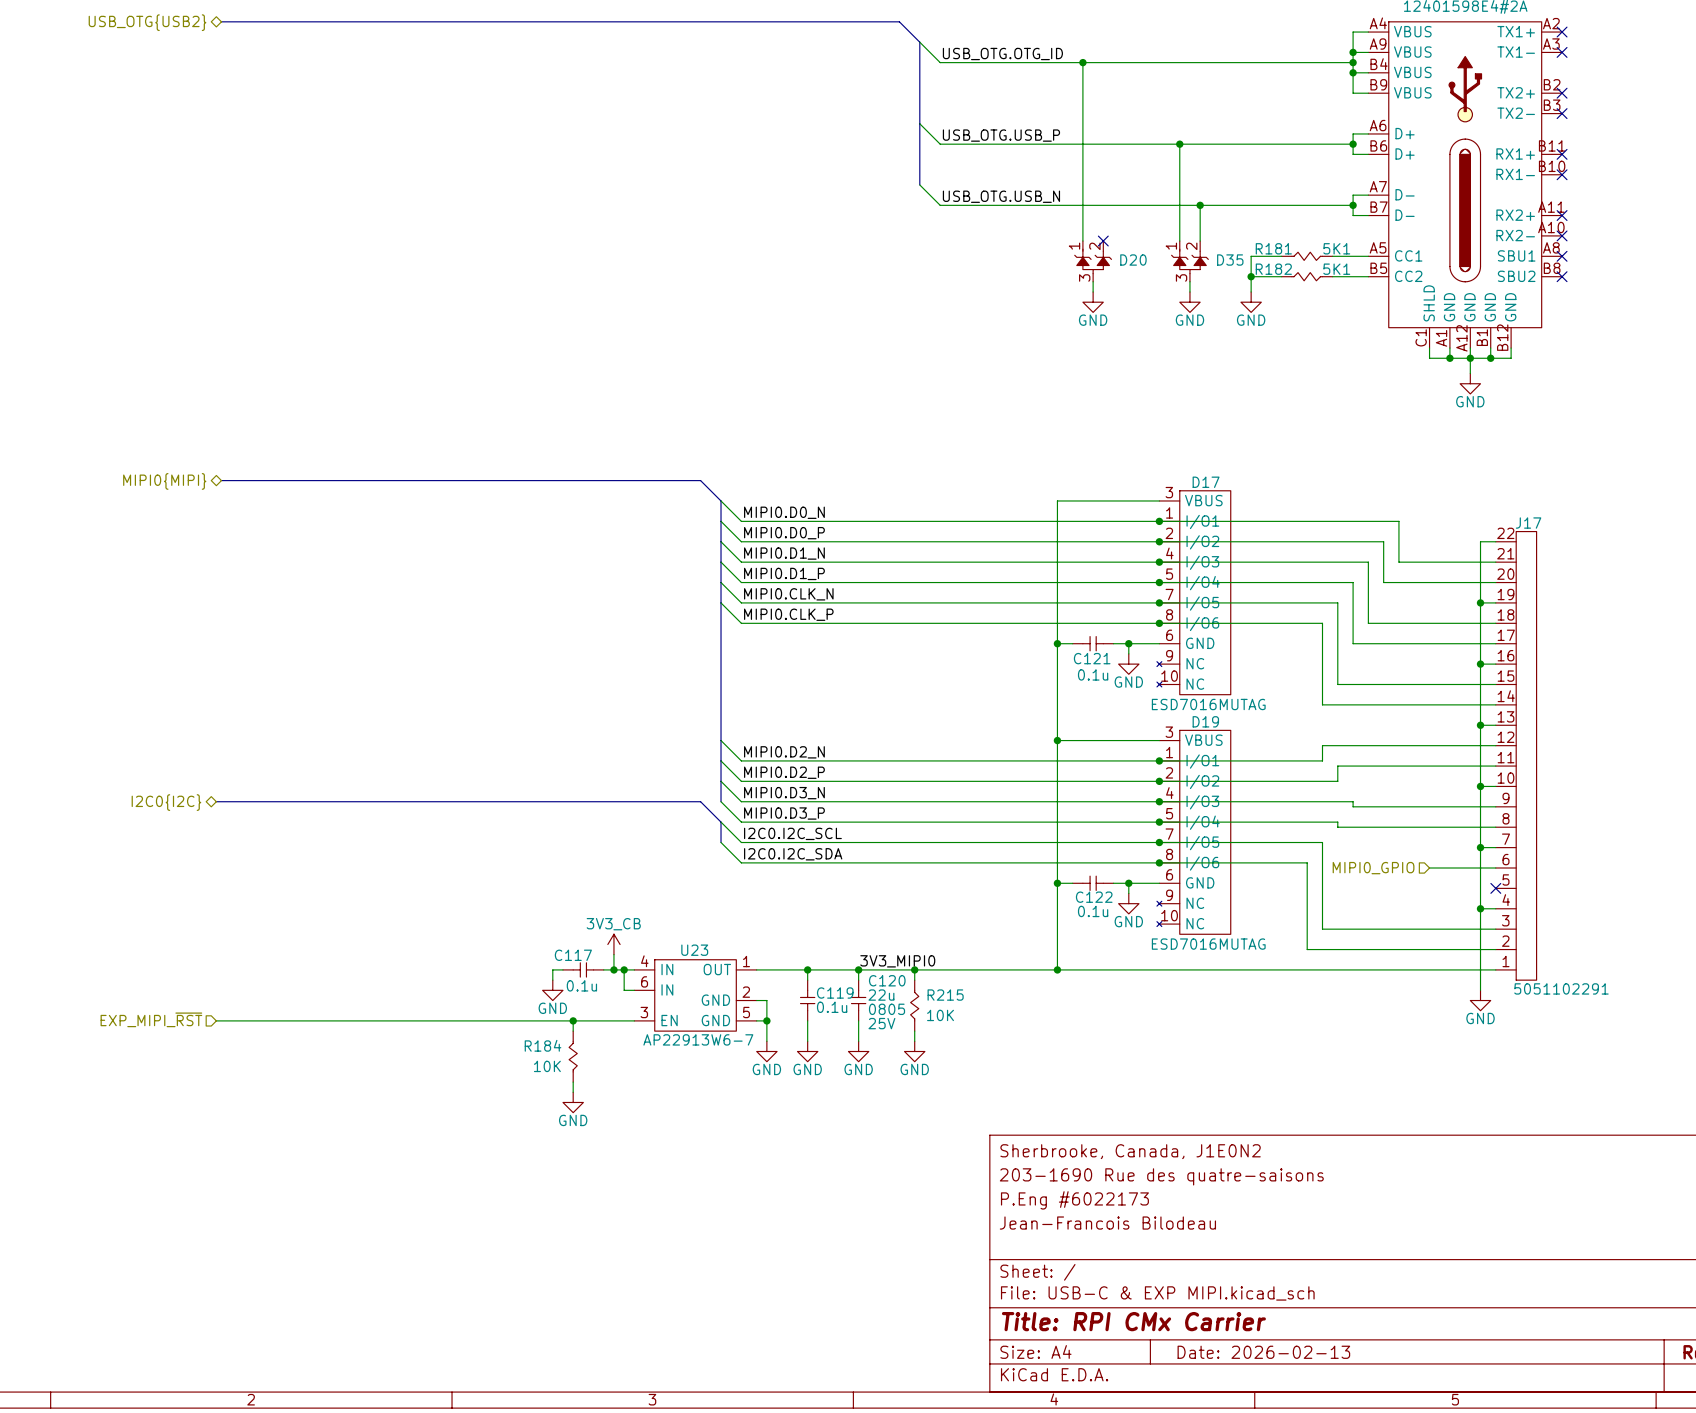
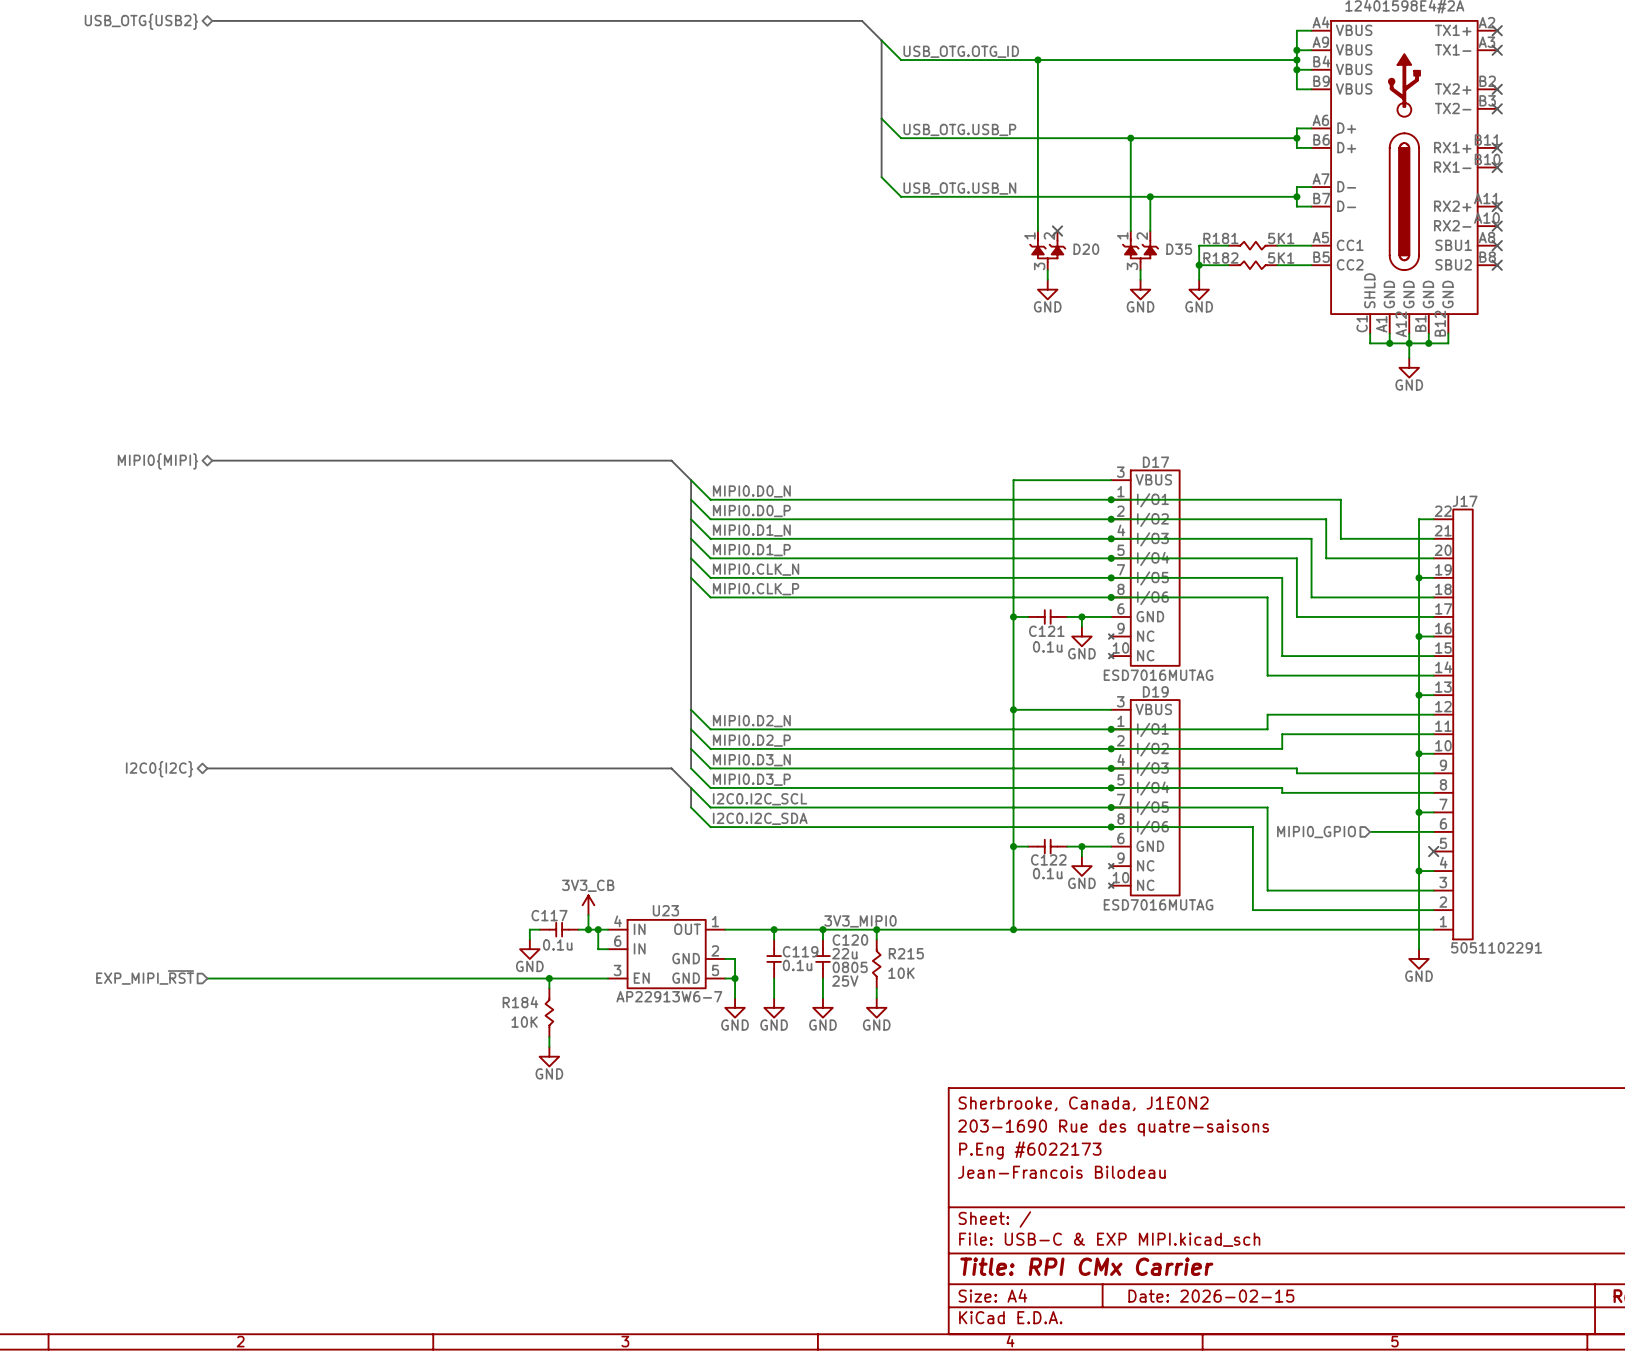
title block: Date: 2026-02-13 (1263, 1352) -> Date: 2026-02-15 (1211, 1296)

